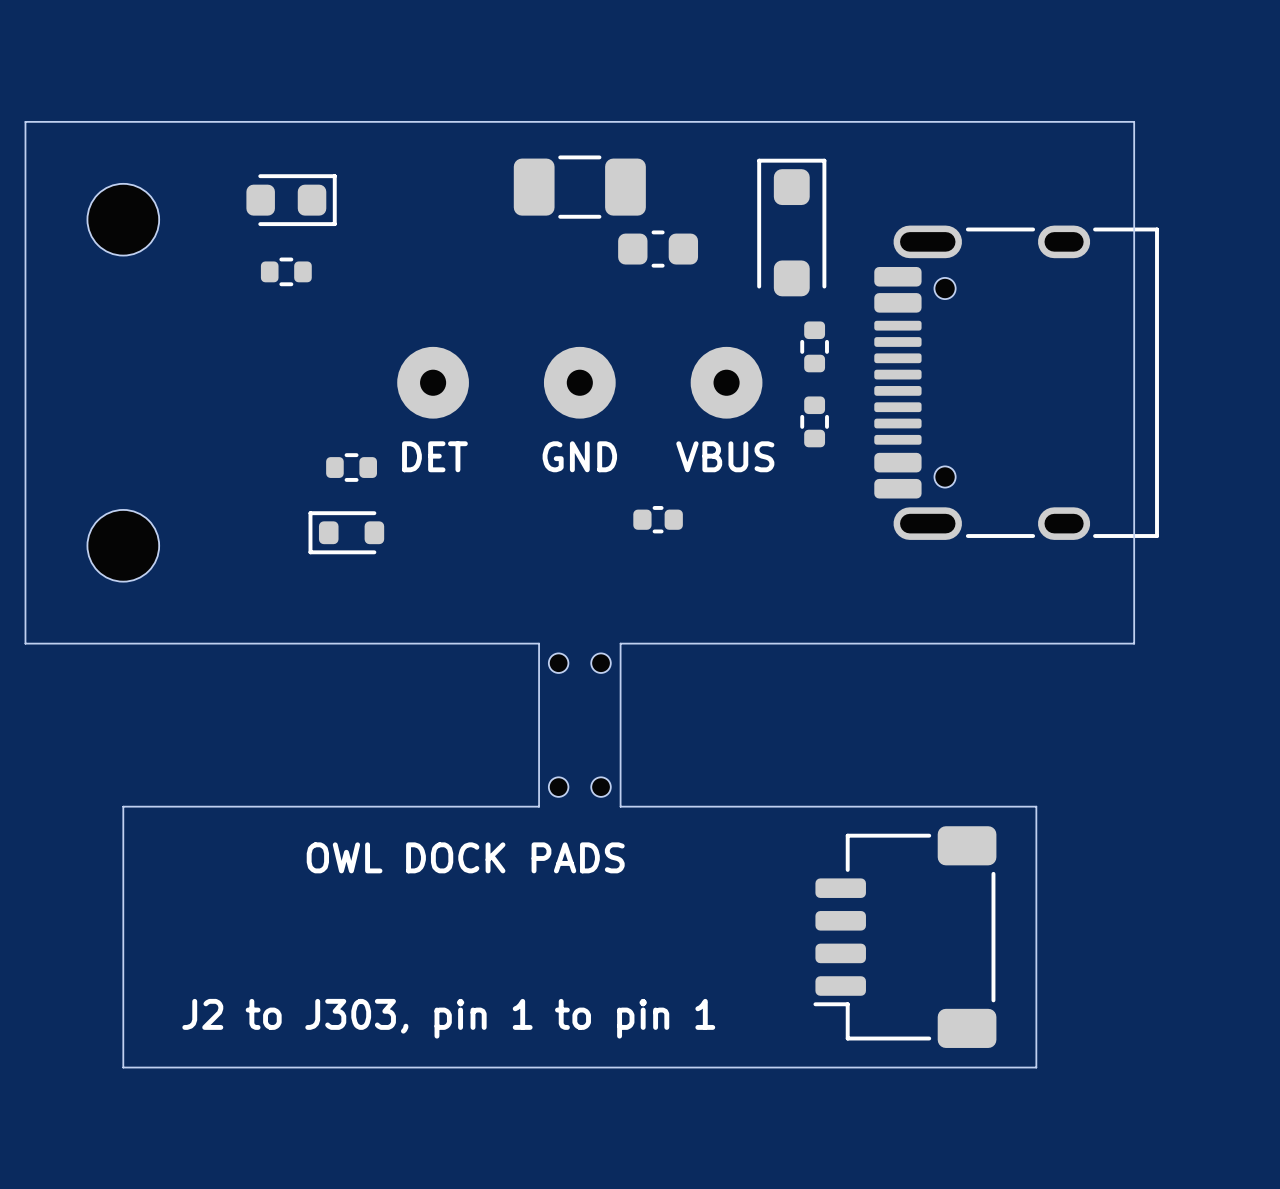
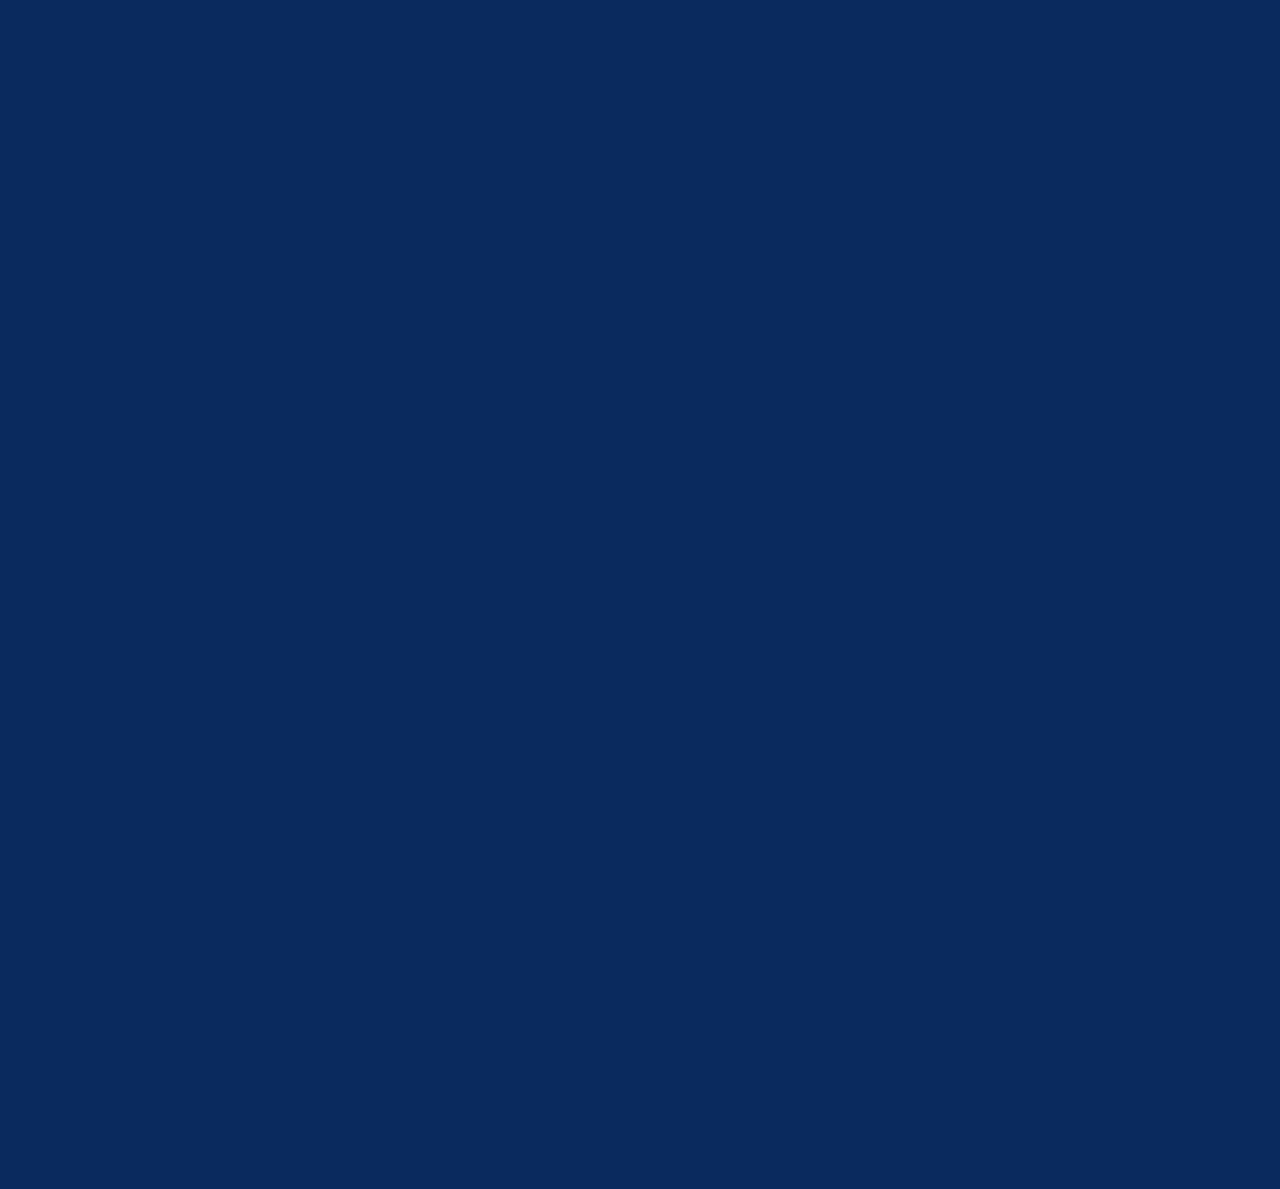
board edge: (25, 121) (1134, 121) (1134, 643) (620, 643) (620, 806) (1036, 806) (1036, 1067) (123, 1067) (123, 806) (539, 806) (539, 643) (25, 643) (25, 121) -> none
part: (579, 187) -> none
part: (291, 200) -> none
part: (123, 219) -> none
part: (791, 227) -> none
part: (658, 249) -> none
part: (286, 271) -> none
part: (814, 346) -> none
part: (433, 382) -> none
part: (579, 382) -> none
part: (726, 382) -> none
part: (1016, 382) -> none
part: (814, 421) -> none
text: DET (434, 456) -> none
text: GND (579, 456) -> none
text: VBUS (725, 456) -> none
part: (351, 467) -> none
part: (658, 519) -> none
part: (346, 532) -> none
part: (123, 545) -> none
part: (579, 663) -> none
part: (579, 787) -> none
text: OWL DOCK PADS (465, 857) -> none
part: (904, 937) -> none
text: J2 to J303, pin 1 to pin 1 (448, 1018) -> none

